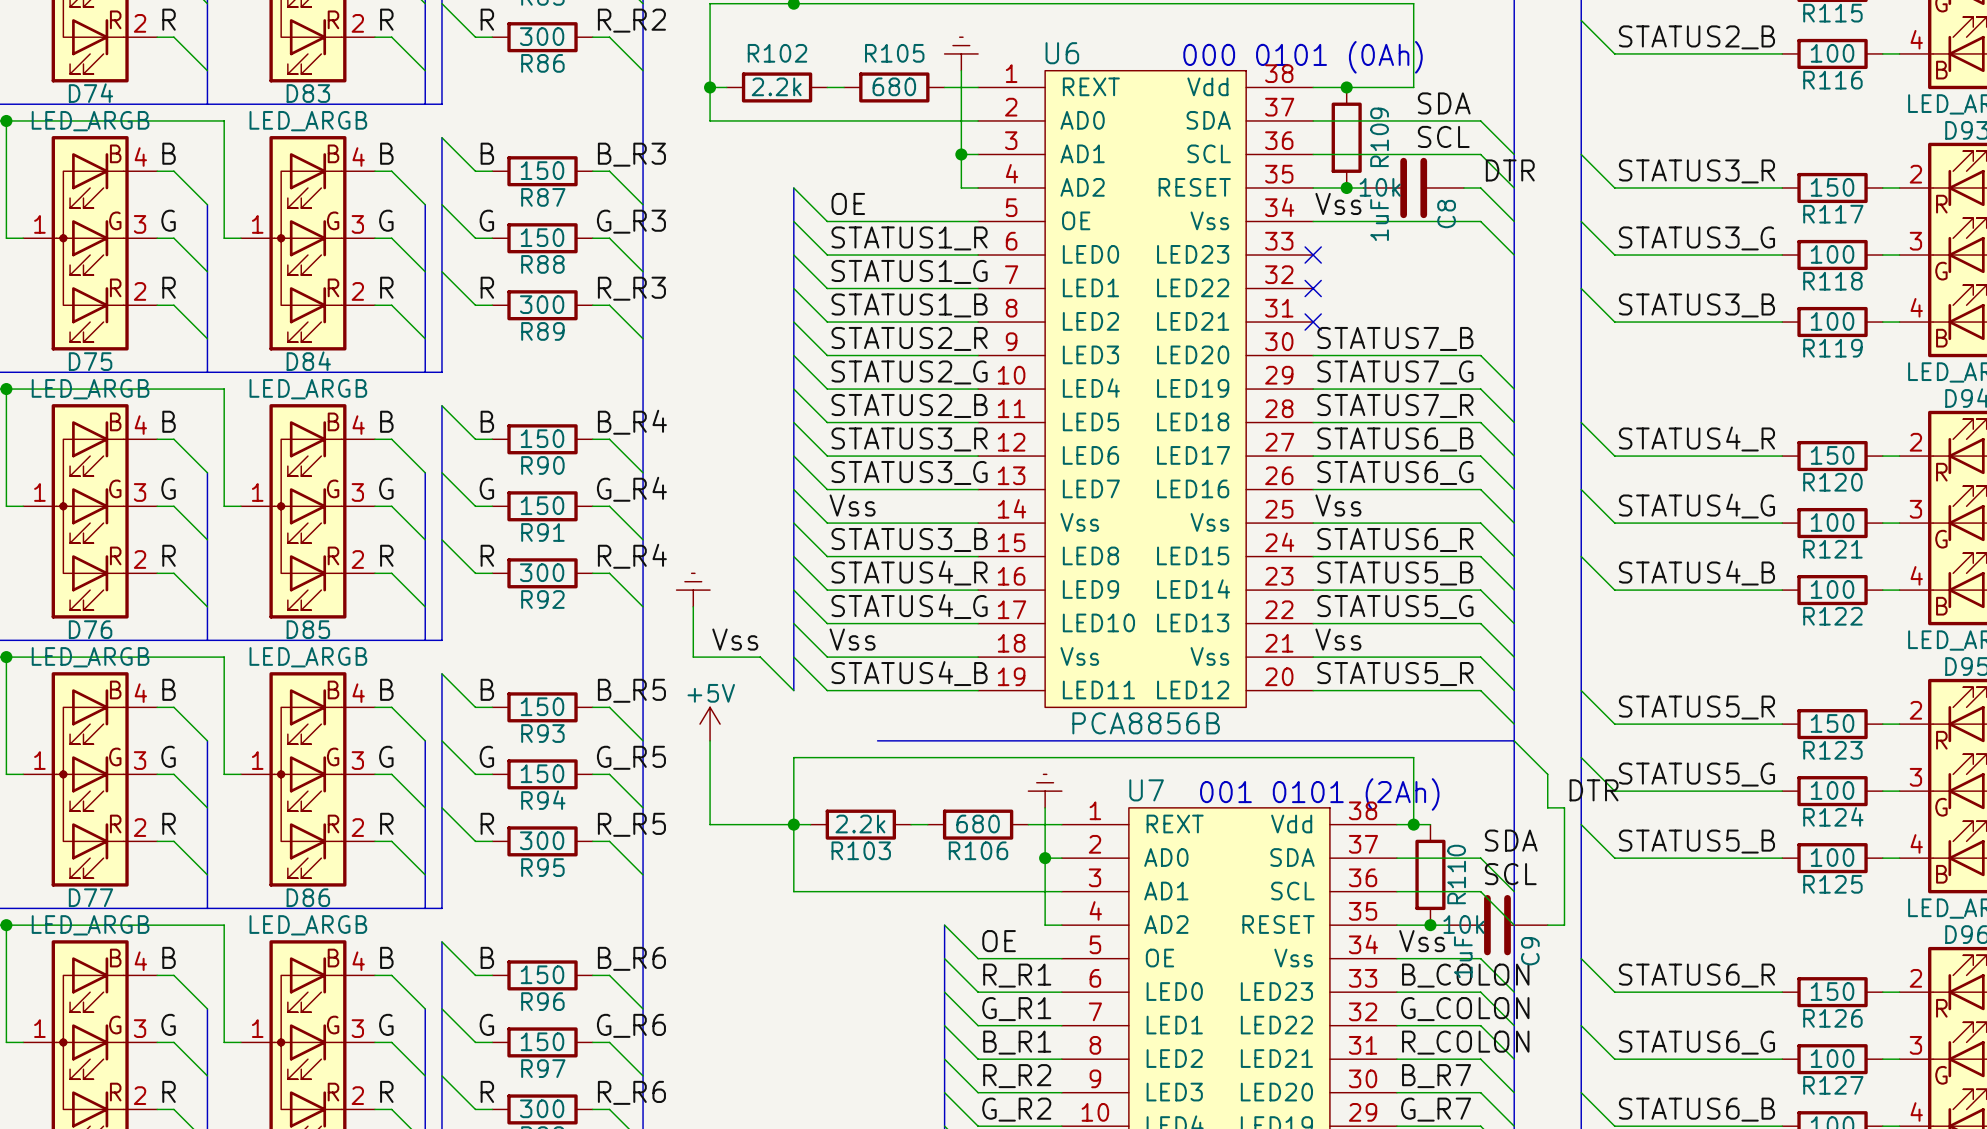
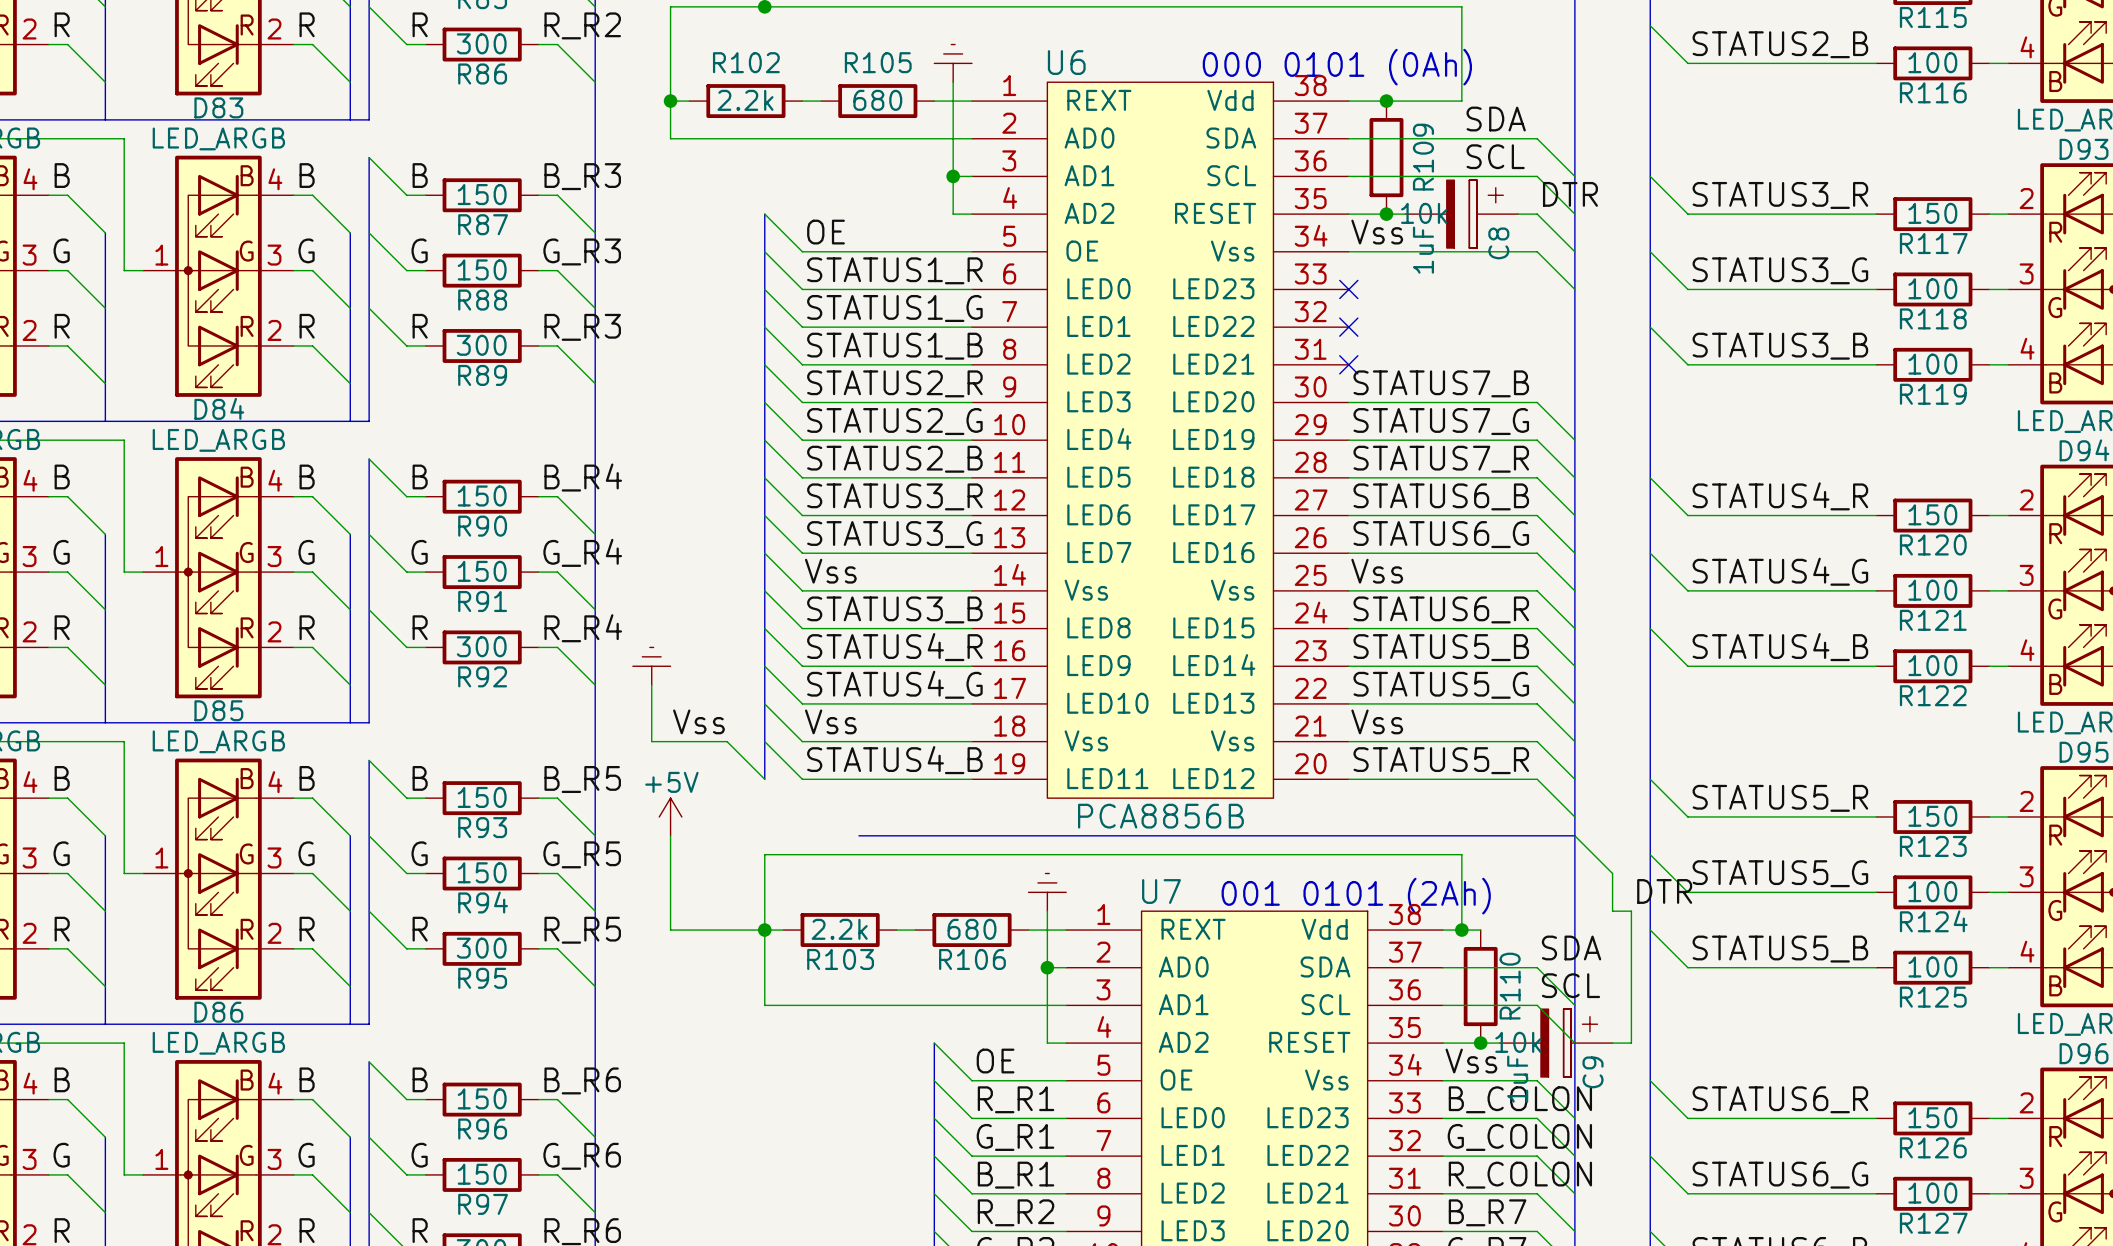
C8 symbol: [1363, 157, 1464, 219] -> [1405, 180, 1519, 249]
C9 symbol: [1447, 894, 1548, 956] -> [1499, 1009, 1613, 1077]

